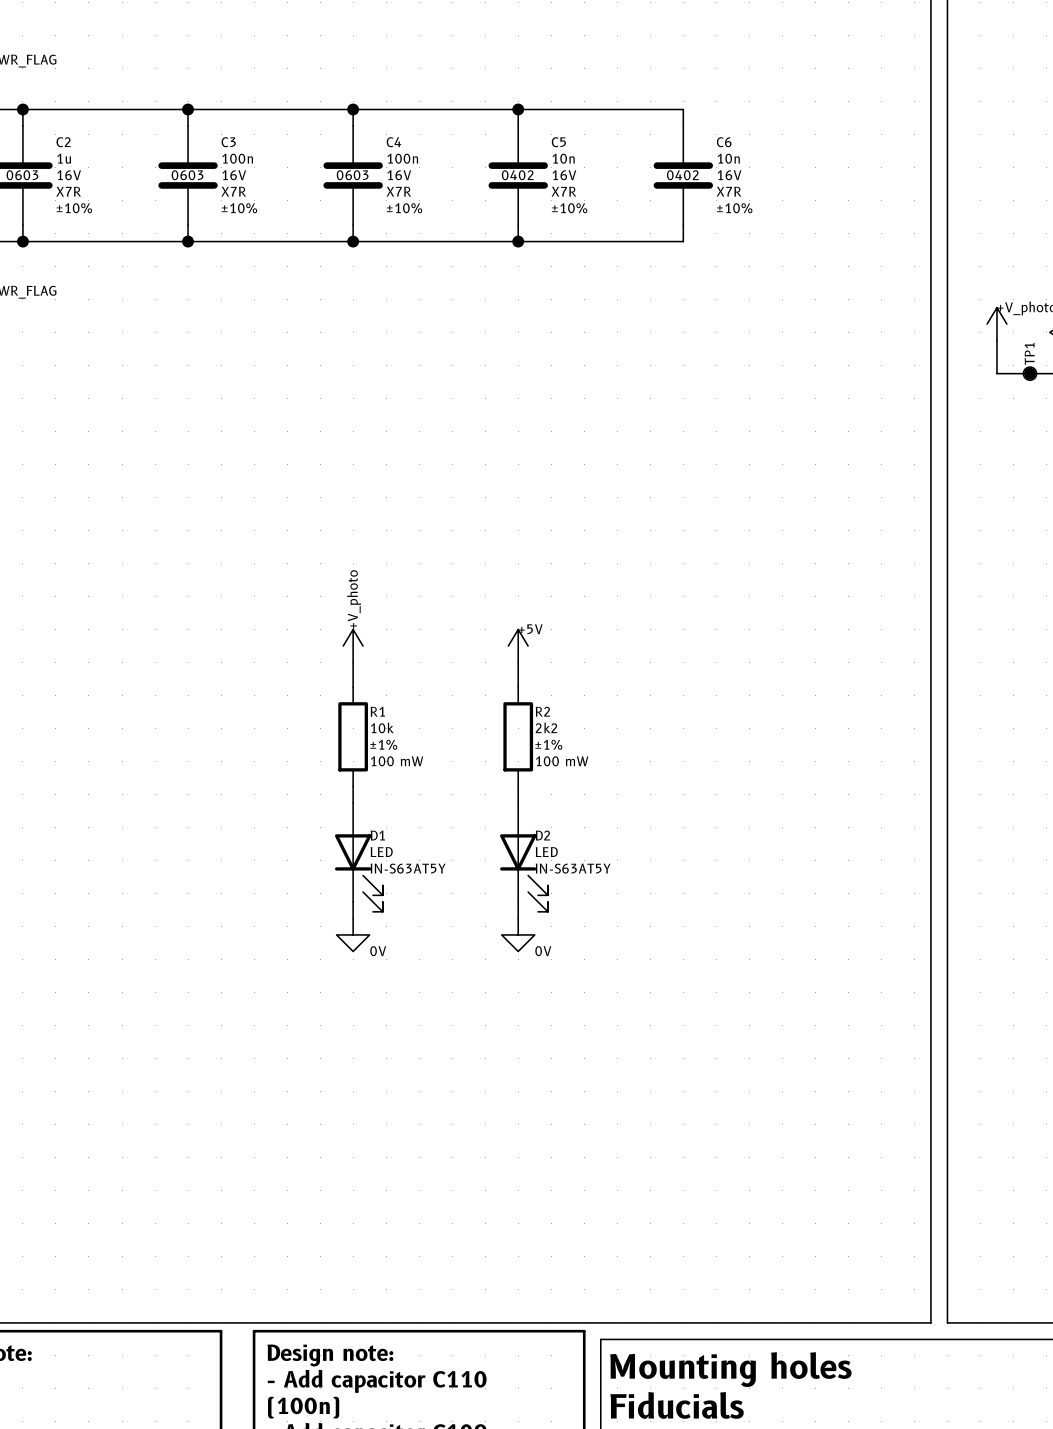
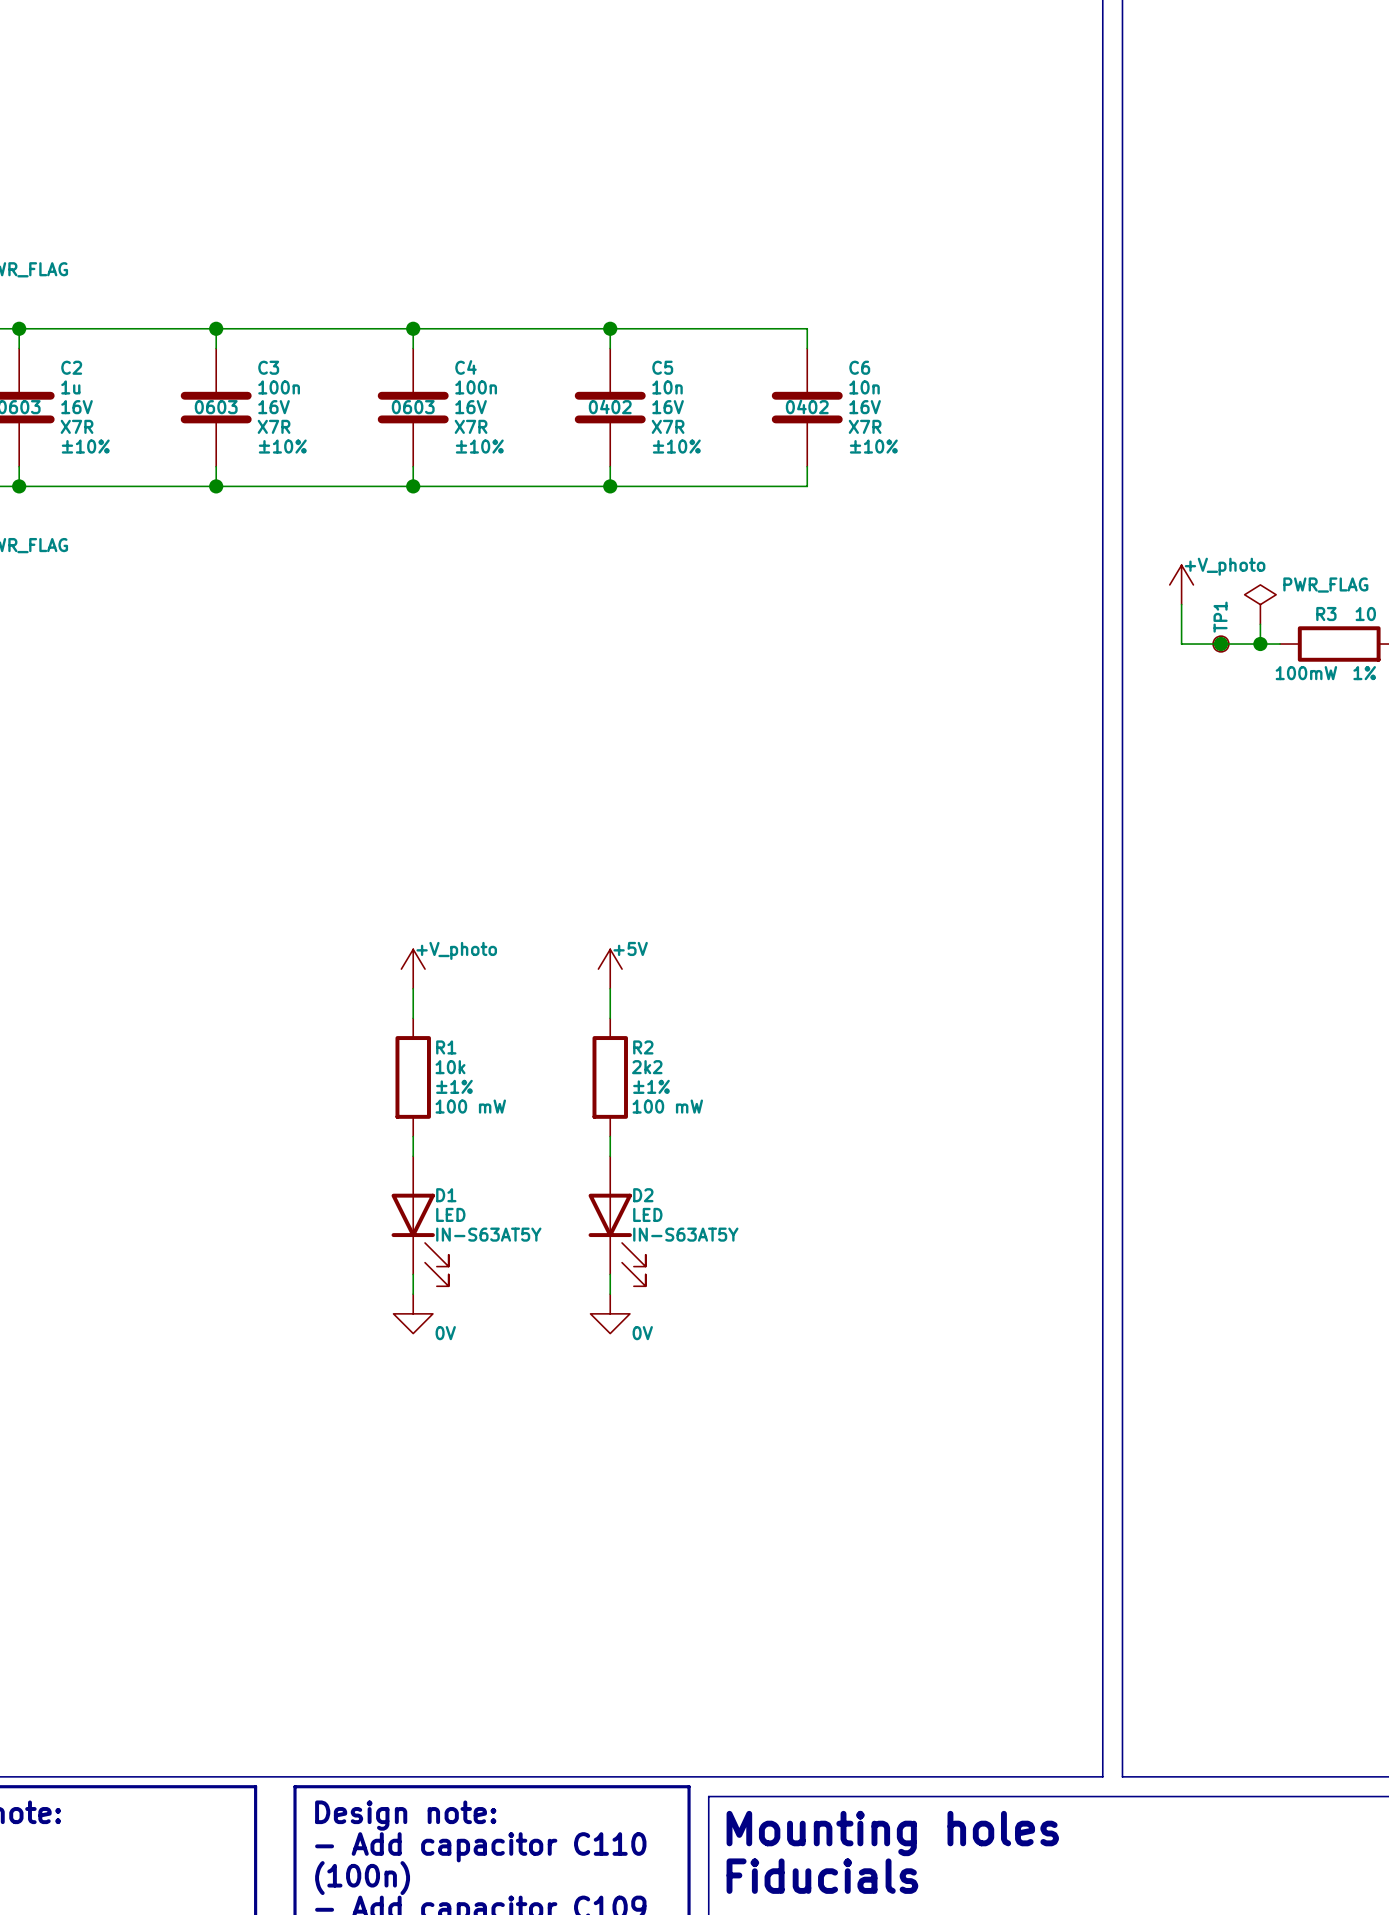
power symbol text rotation: 0° (354, 599) -> 90° clockwise (456, 950)

